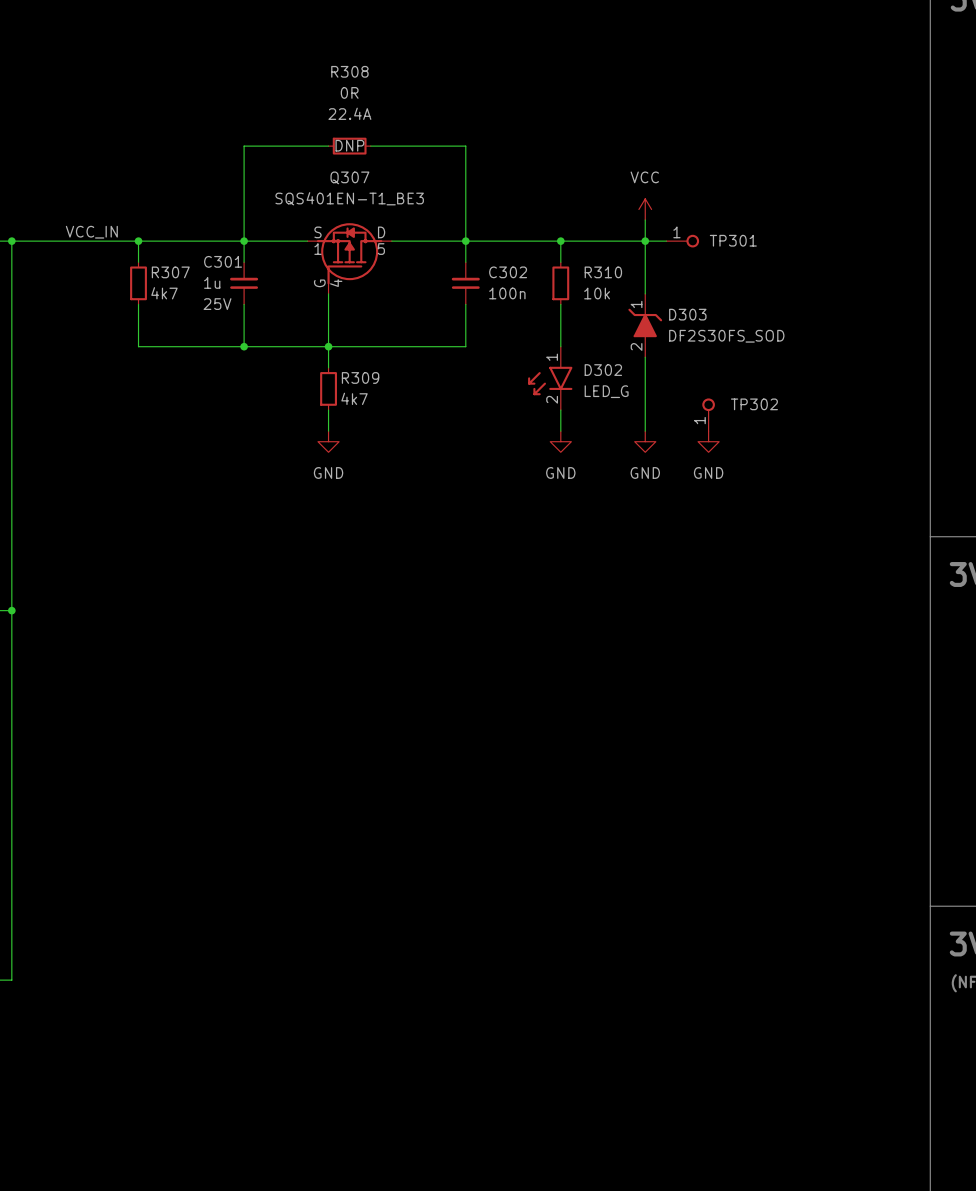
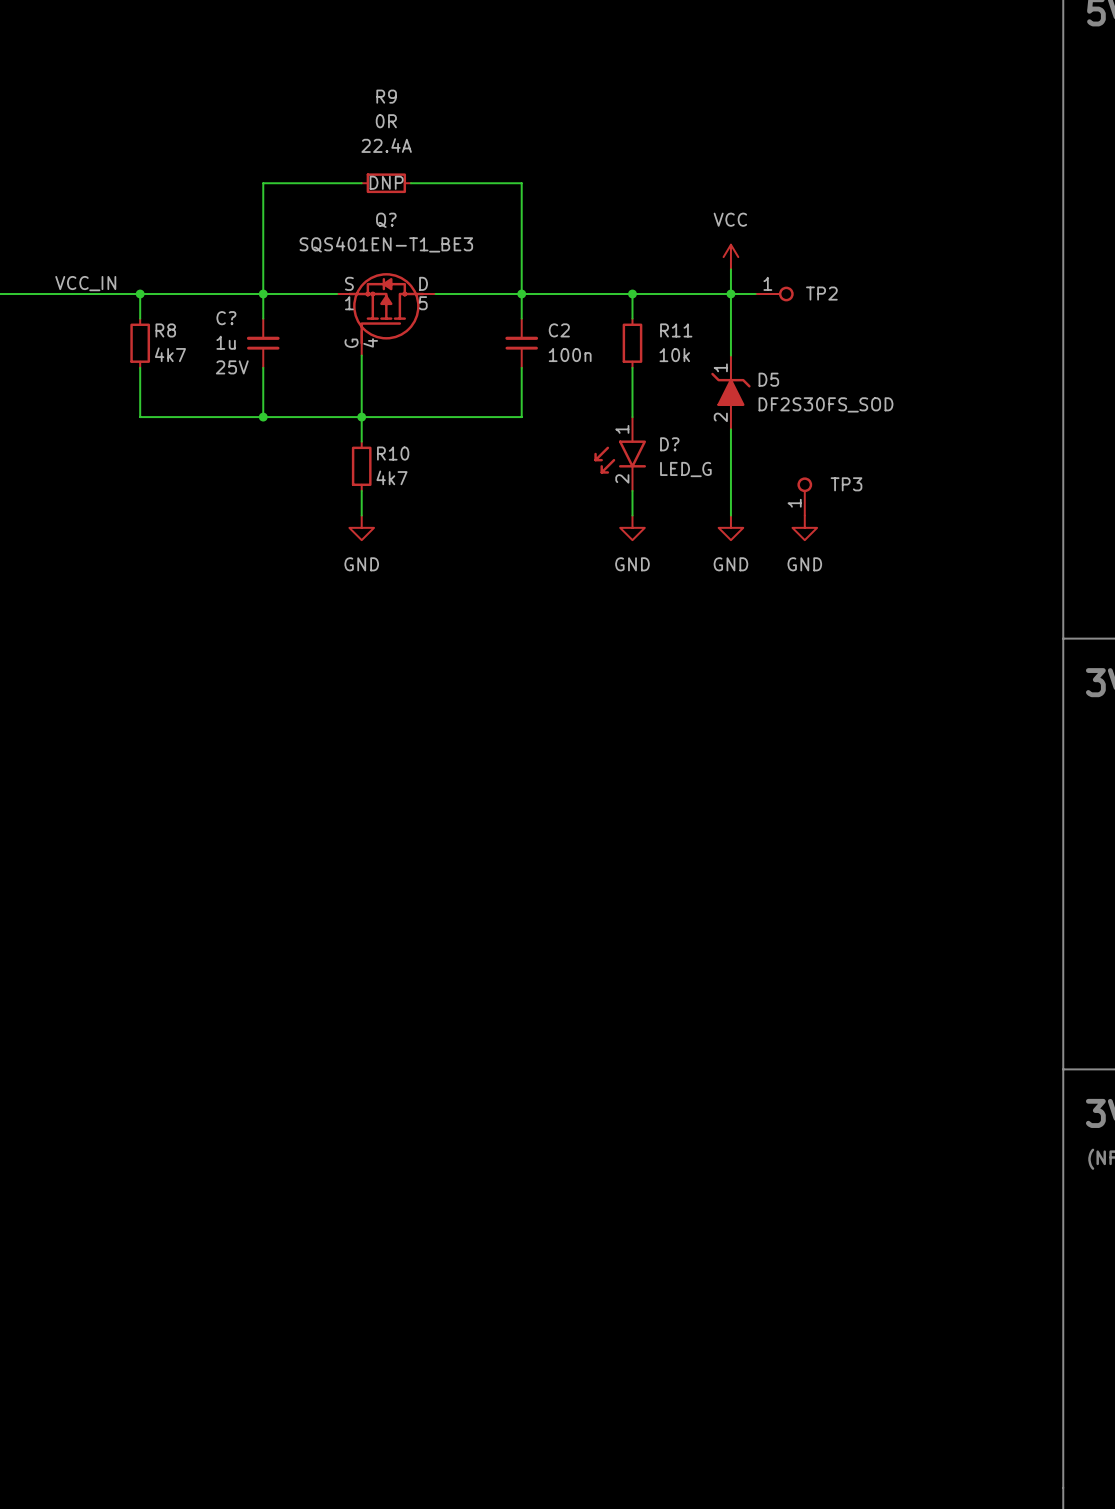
R308 name: R308 (349, 71) -> R9 (386, 96)
Q307 name: Q307 (349, 177) -> Q? (386, 220)
TP301 name: TP301 (733, 240) -> TP2 (821, 293)
C301 name: C301 (223, 261) -> C? (226, 318)
R307 name: R307 (170, 272) -> R8 (165, 330)
C302 name: C302 (508, 272) -> C2 (559, 330)
R310 name: R310 (603, 272) -> R11 (676, 330)
D303 name: D303 (687, 314) -> D5 (768, 379)
D302 name: D302 (603, 370) -> D? (669, 444)
R309 name: R309 (360, 377) -> R10 (393, 453)
TP302 name: TP302 (754, 404) -> TP3 (846, 484)

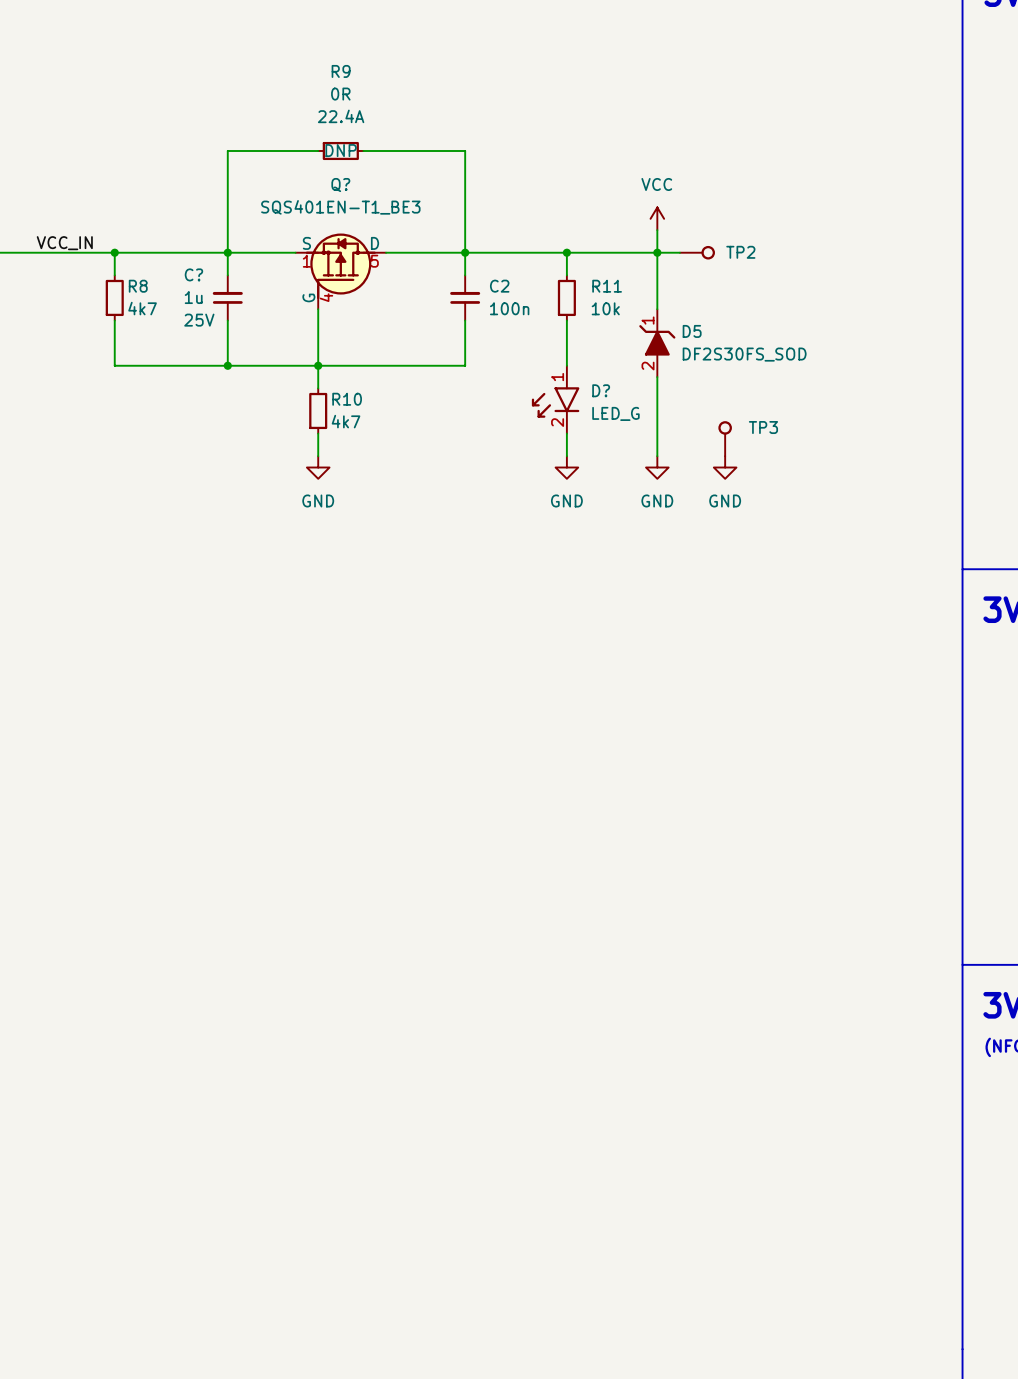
TP2 pin number: 1 (767, 283) -> none
TP3 pin number: 1 (794, 503) -> none

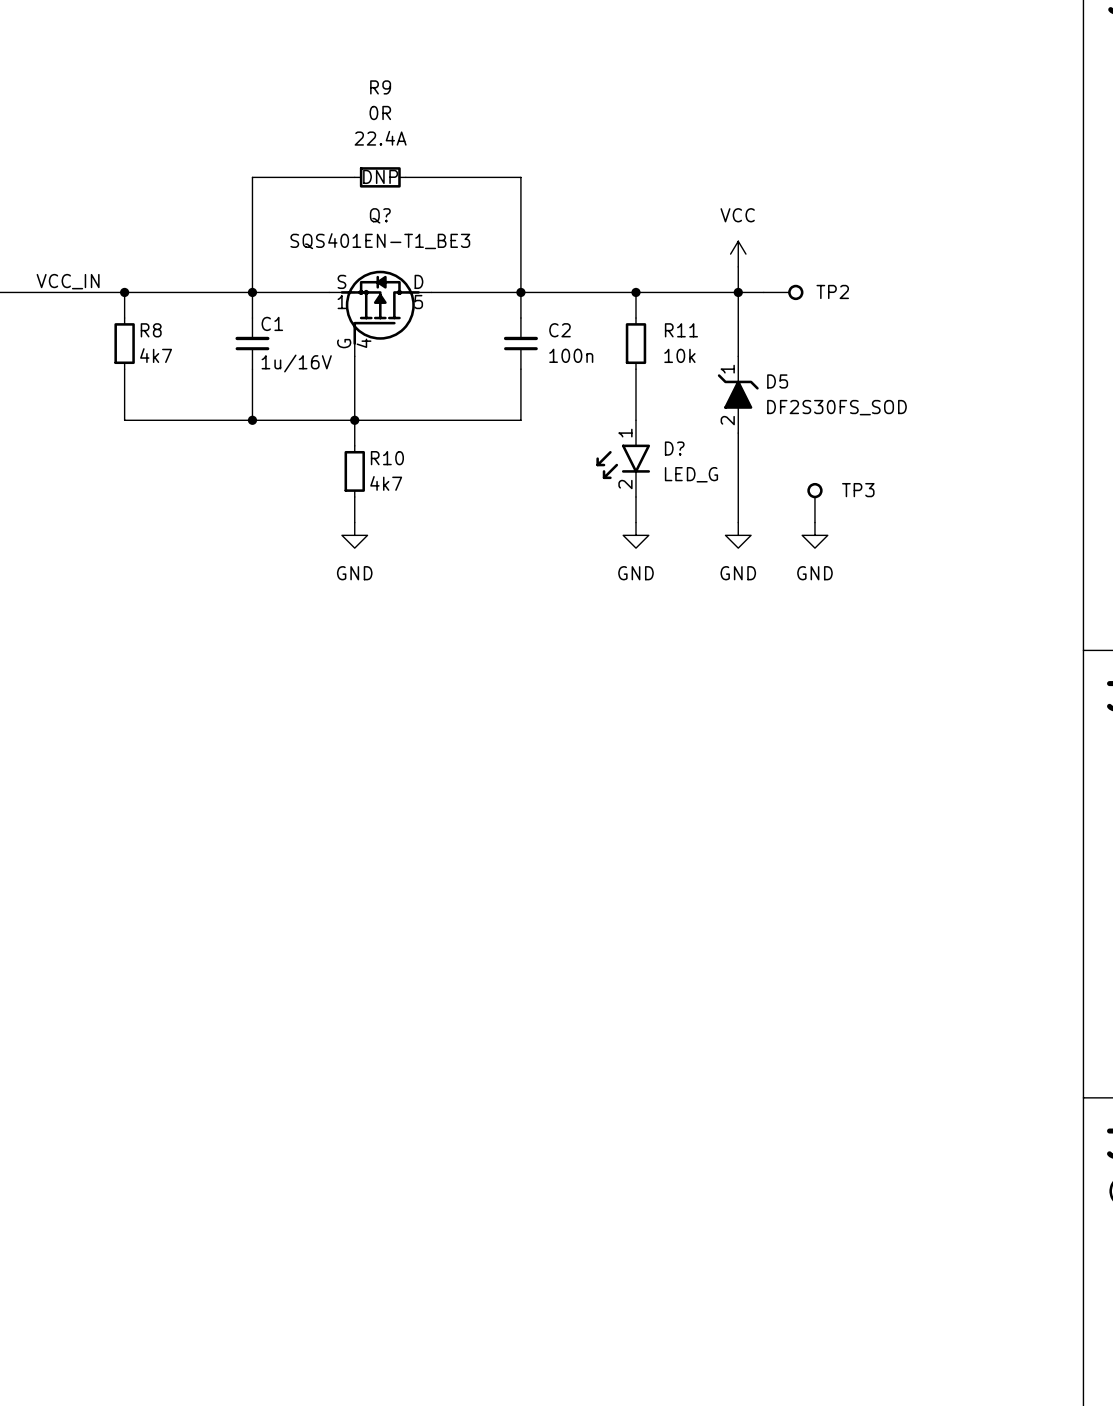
C? name: C? (193, 274) -> C1 (272, 323)
C? text: 1u (193, 297) -> 1u/16V (296, 363)
C? text: 25V (199, 320) -> none

